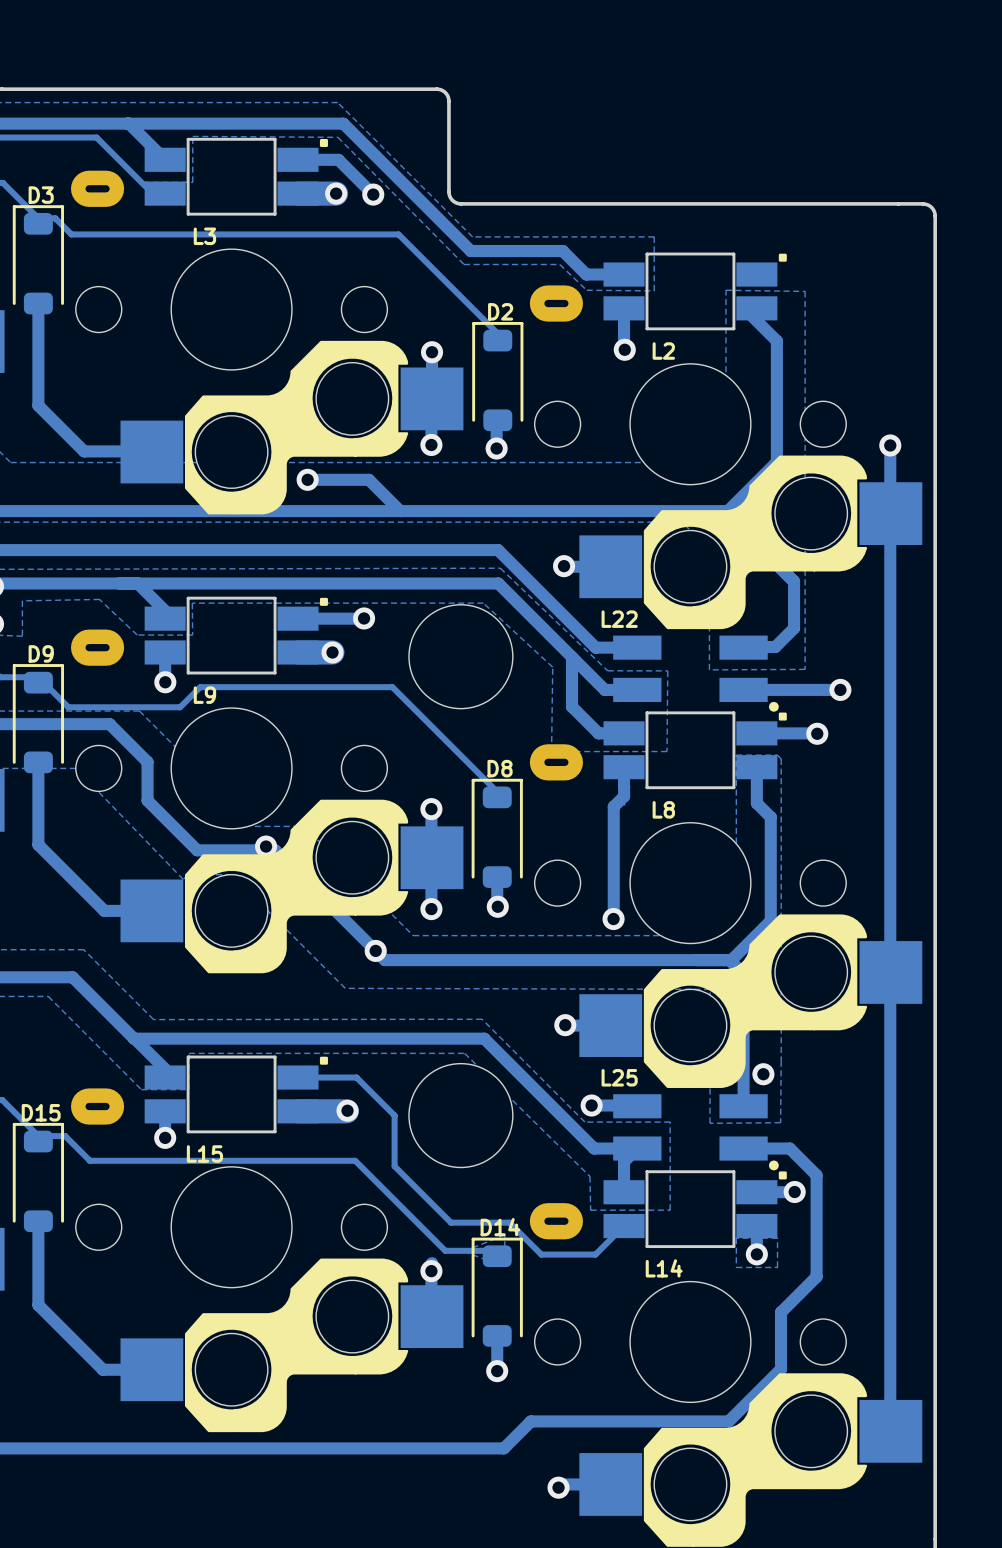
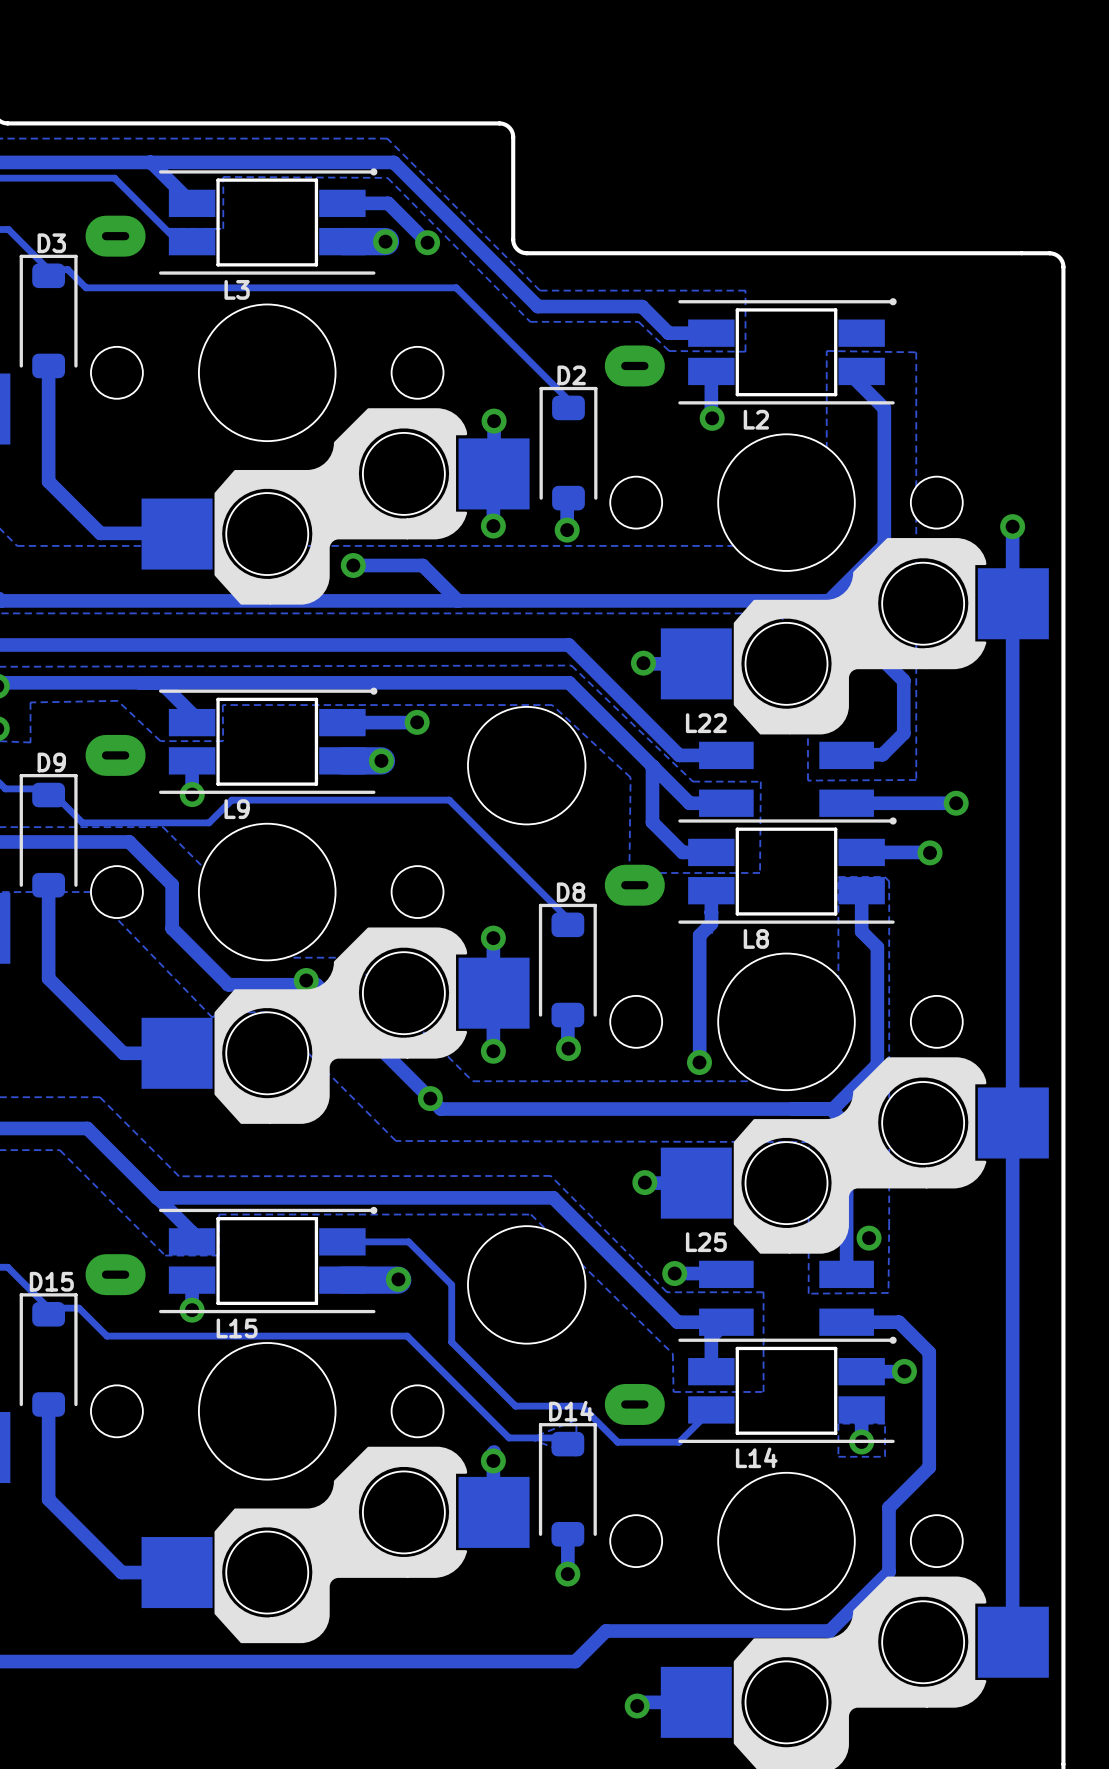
L3 footprint: [144, 137, 328, 216] -> [159, 168, 378, 275]
L2 footprint: [603, 252, 787, 331] -> [678, 298, 897, 405]
L9 footprint: [144, 596, 328, 675] -> [159, 687, 378, 794]
L22 footprint: [613, 635, 779, 712] -> [699, 741, 874, 817]
L8 footprint: [603, 711, 787, 790] -> [678, 817, 897, 924]
L15 footprint: [144, 1055, 328, 1134] -> [159, 1206, 378, 1314]
L25 footprint: [613, 1094, 779, 1171] -> [699, 1260, 874, 1336]
L14 footprint: [603, 1170, 787, 1249] -> [678, 1336, 897, 1444]

